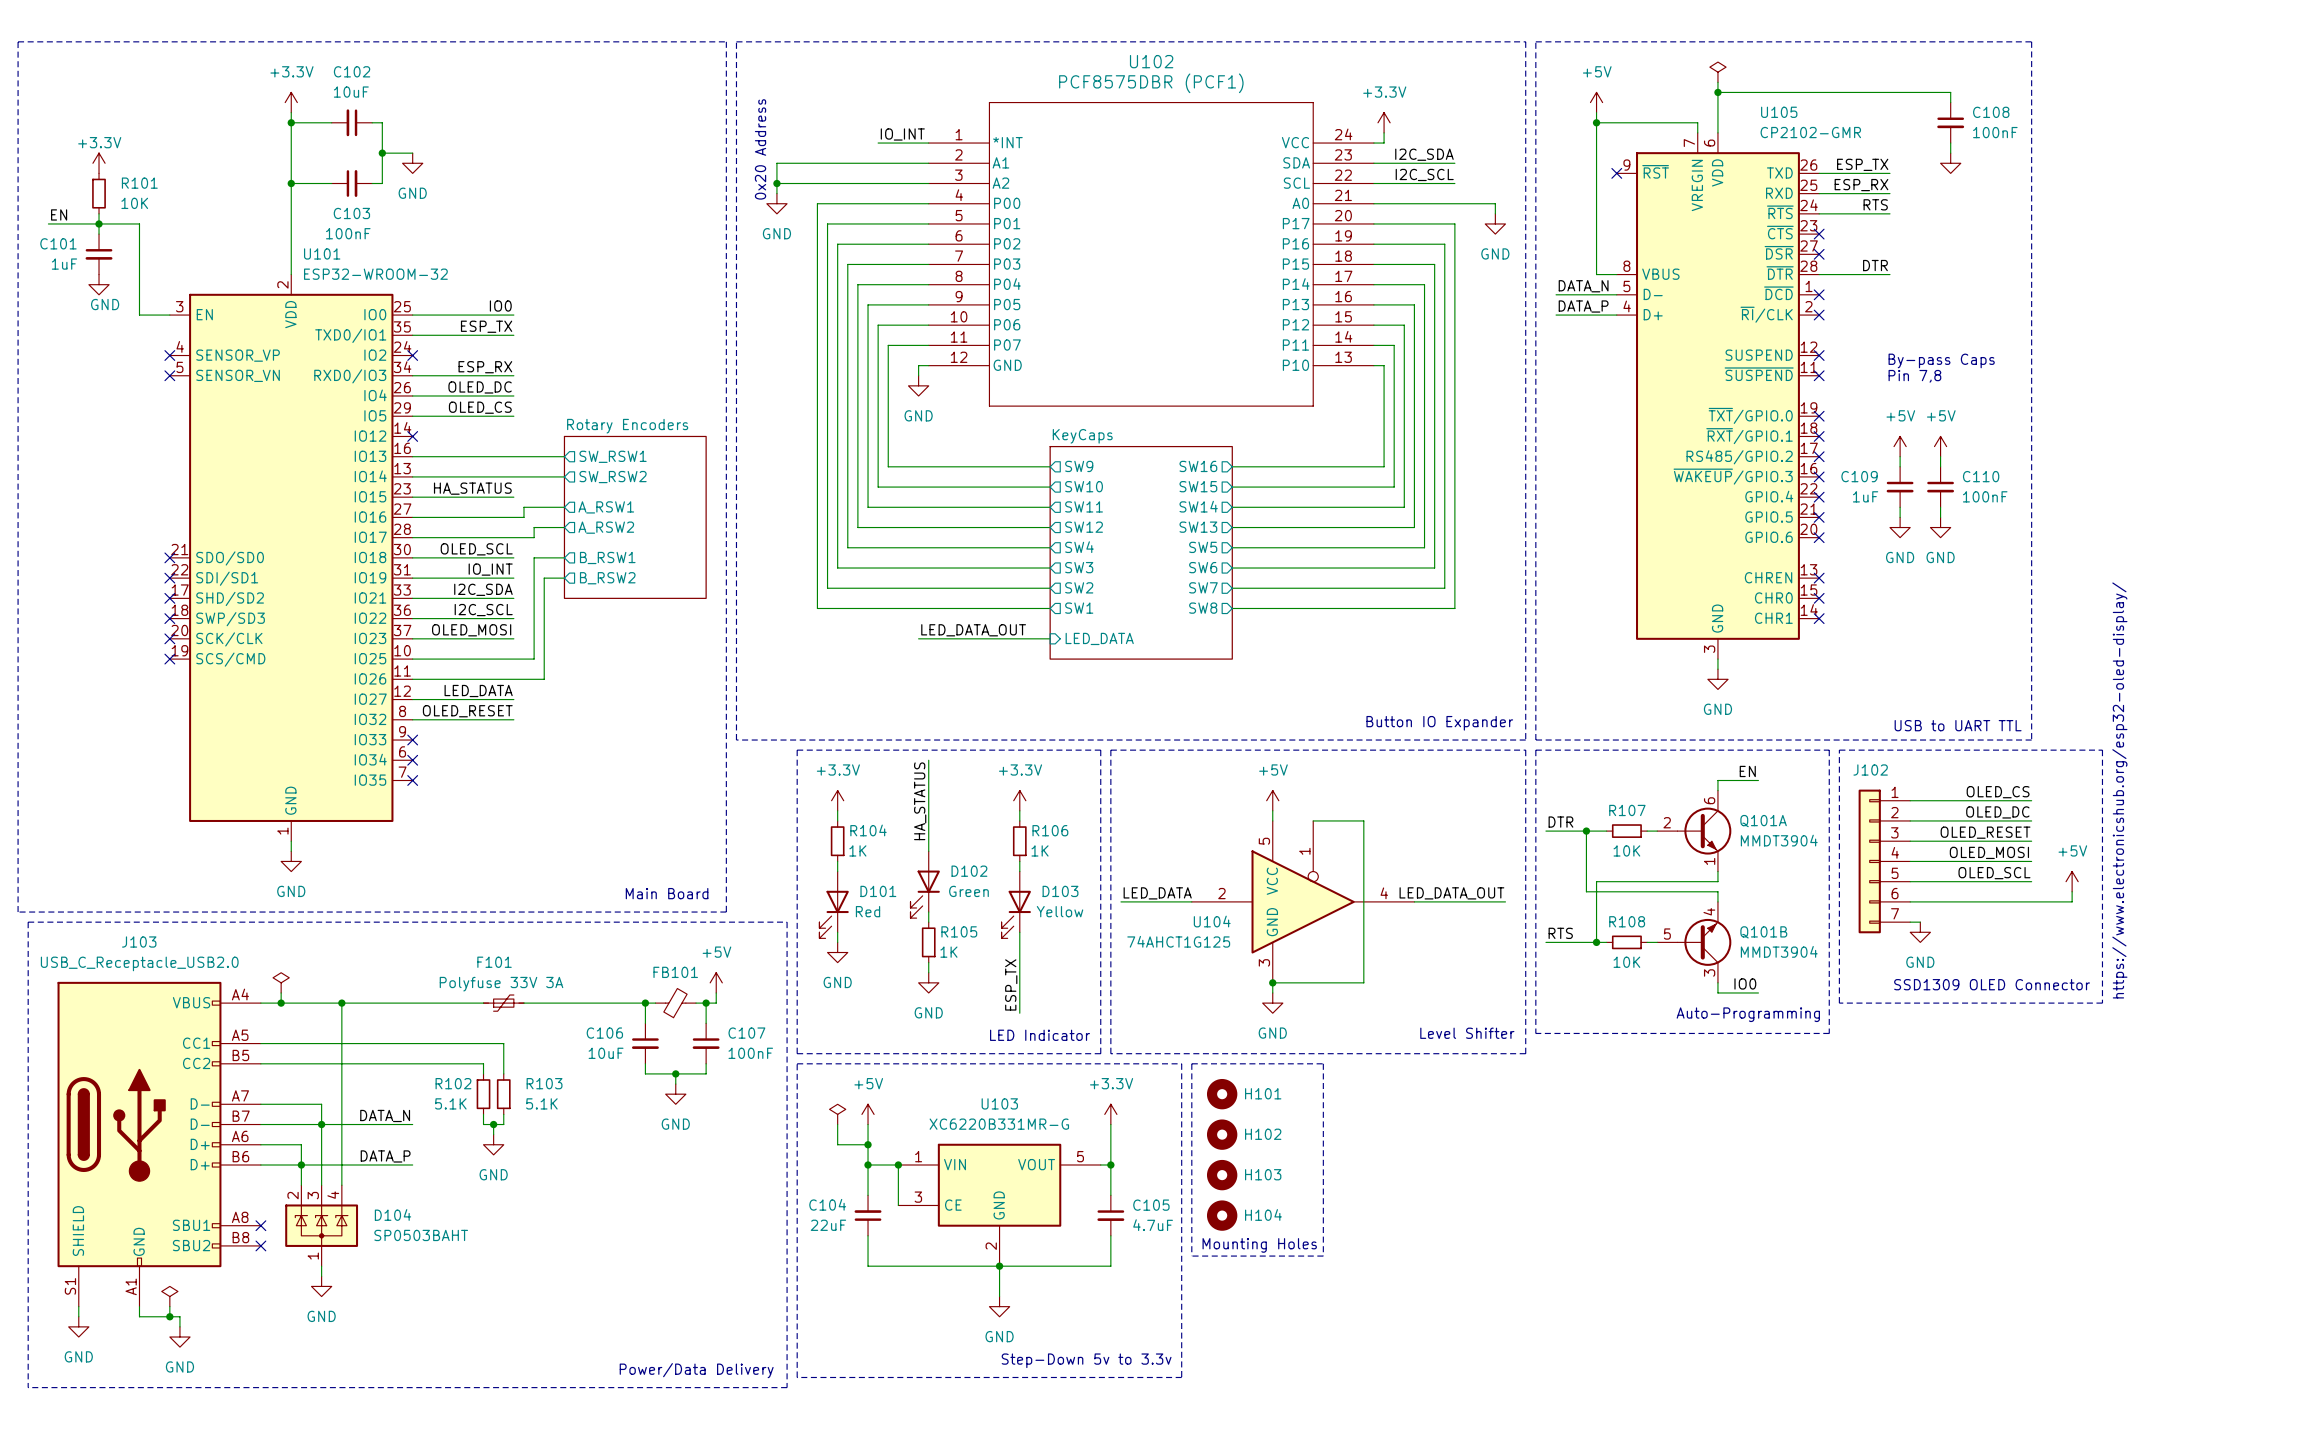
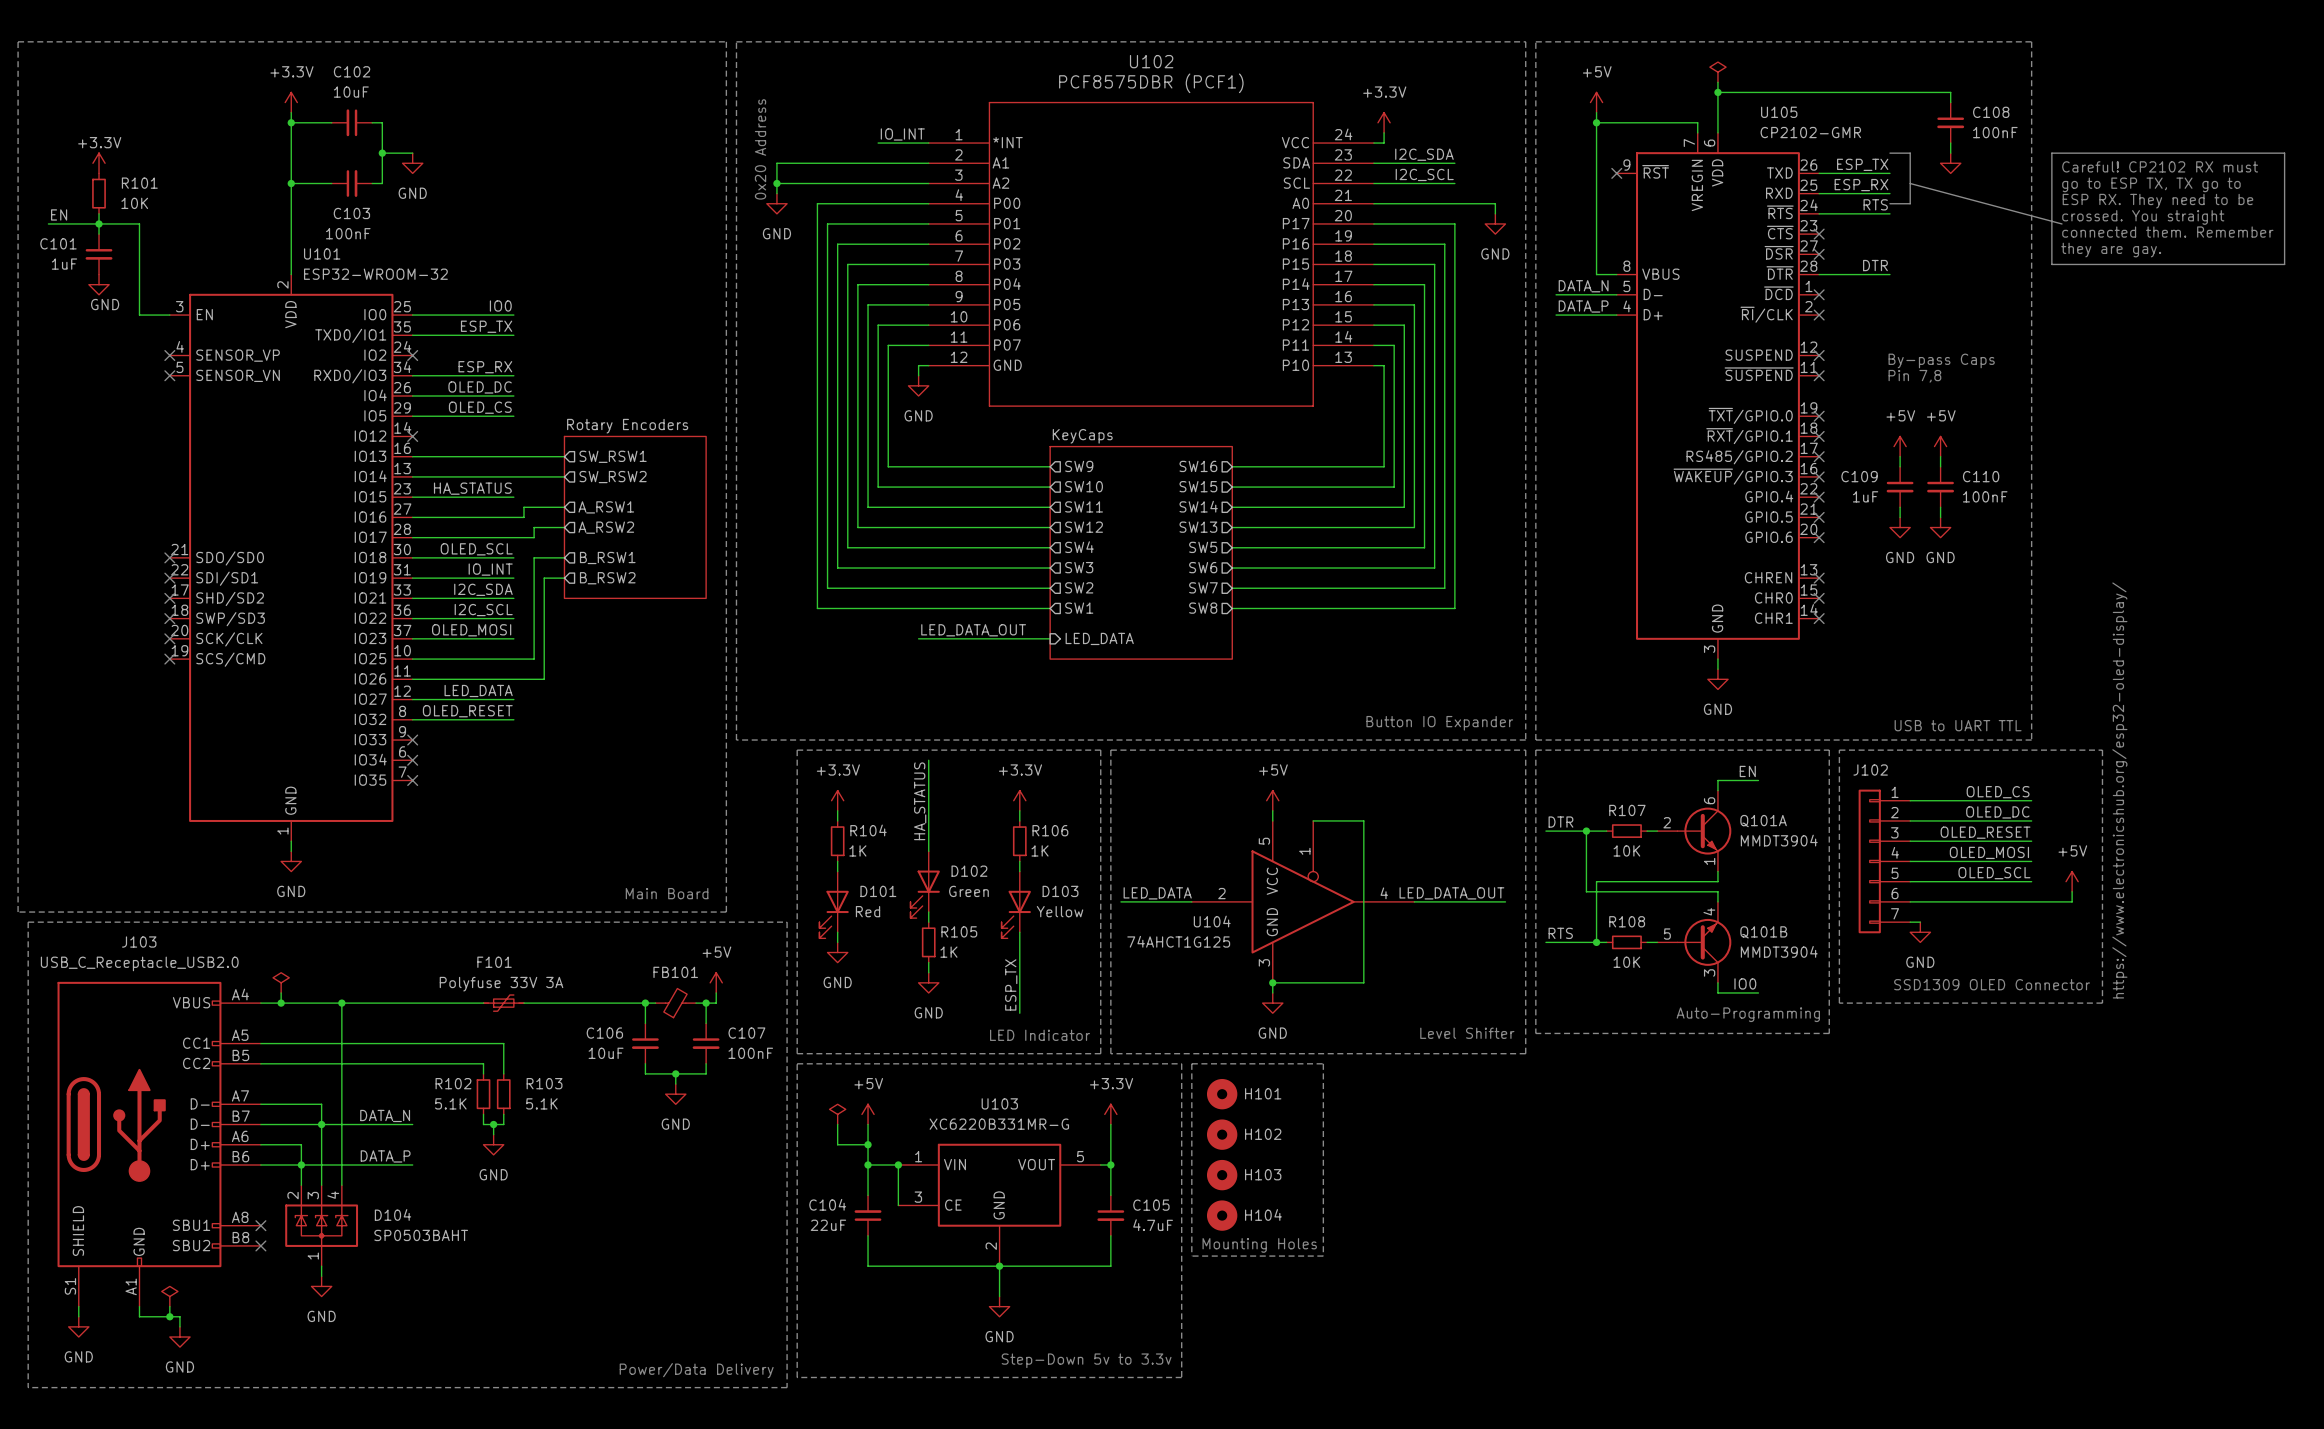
line: none -> (1889, 153) (1910, 153) (1910, 203) (1889, 203)
line: none -> (2051, 153) (2284, 153) (2284, 264) (2051, 264) (2051, 153)
text: none -> Careful! CP2102 RX must (2160, 166)
line: none -> (1910, 183) (2061, 223)
text: none -> go to ESP TX, TX go to (2151, 184)
text: none -> ESP RX. They need to be (2157, 201)
text: none -> crossed. You straight (2143, 217)
text: none -> connected them. Remember (2167, 232)
text: none -> they are gay. (2111, 250)

